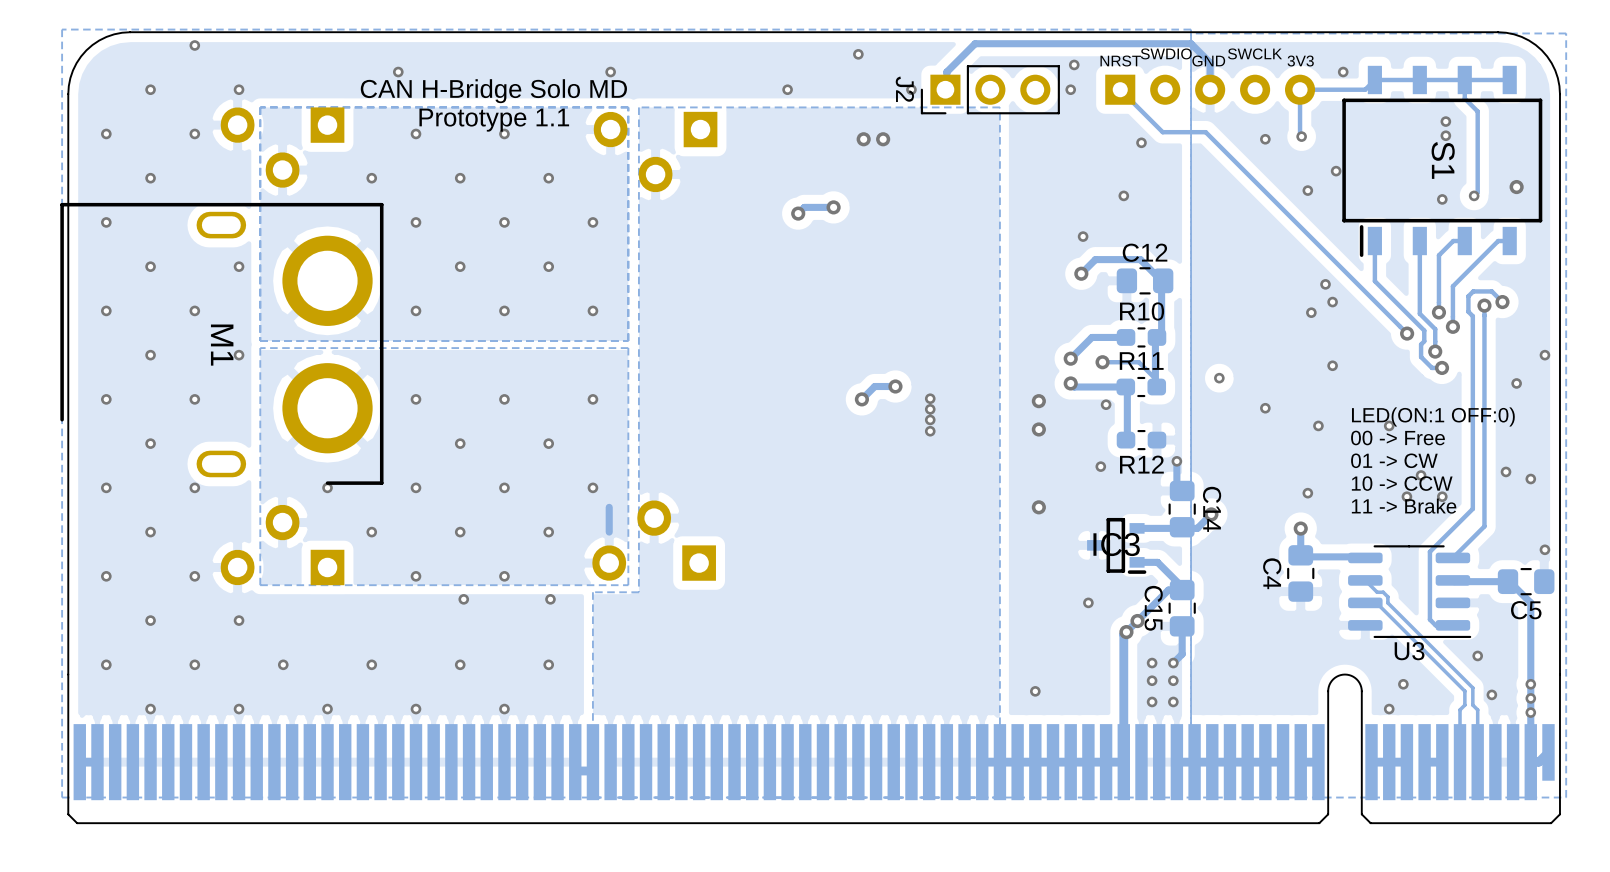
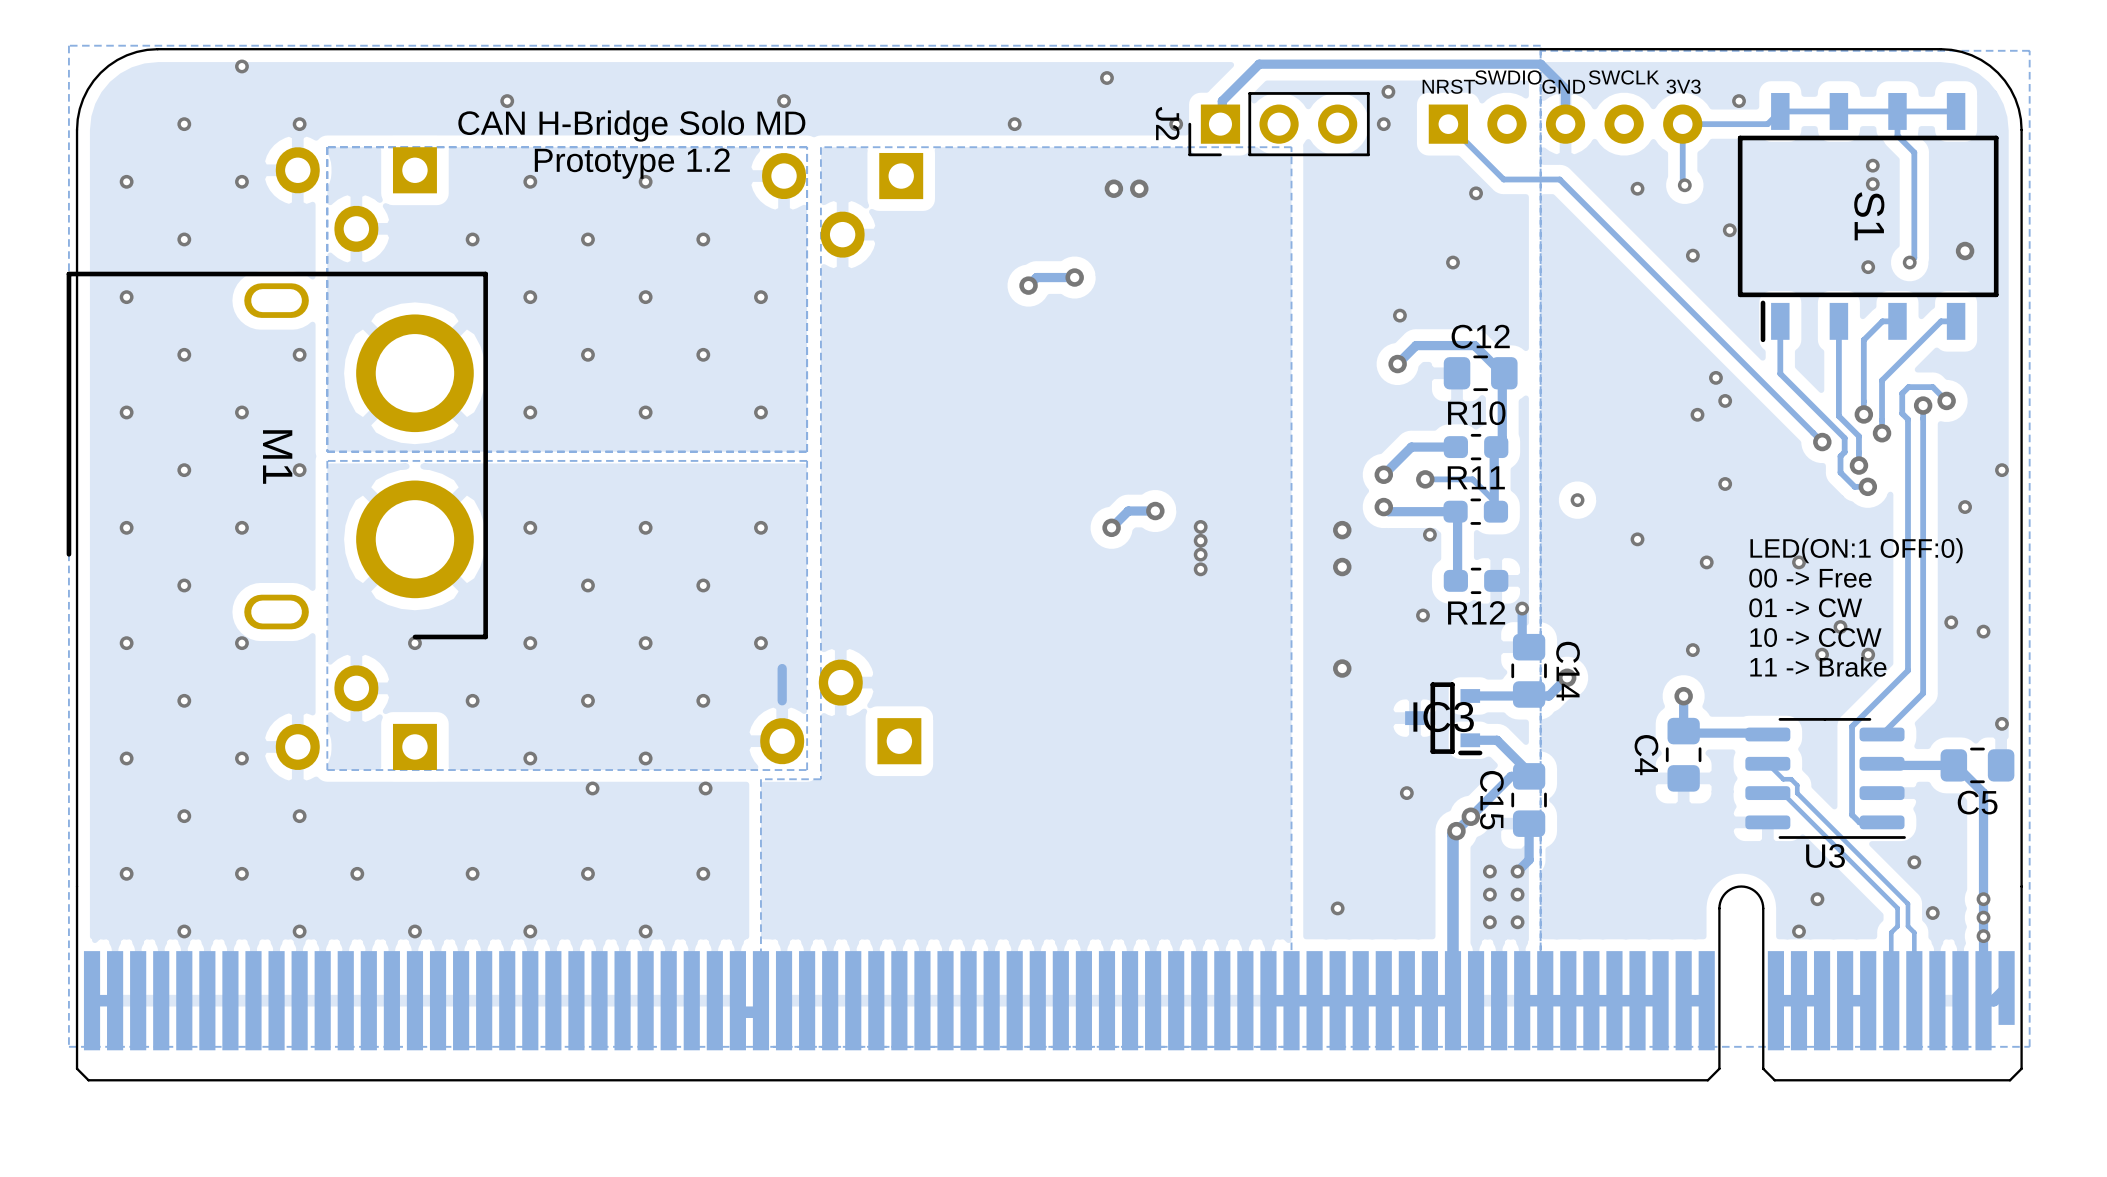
text: Prototype 1.1 (494, 120) -> Prototype 1.2 (632, 163)

